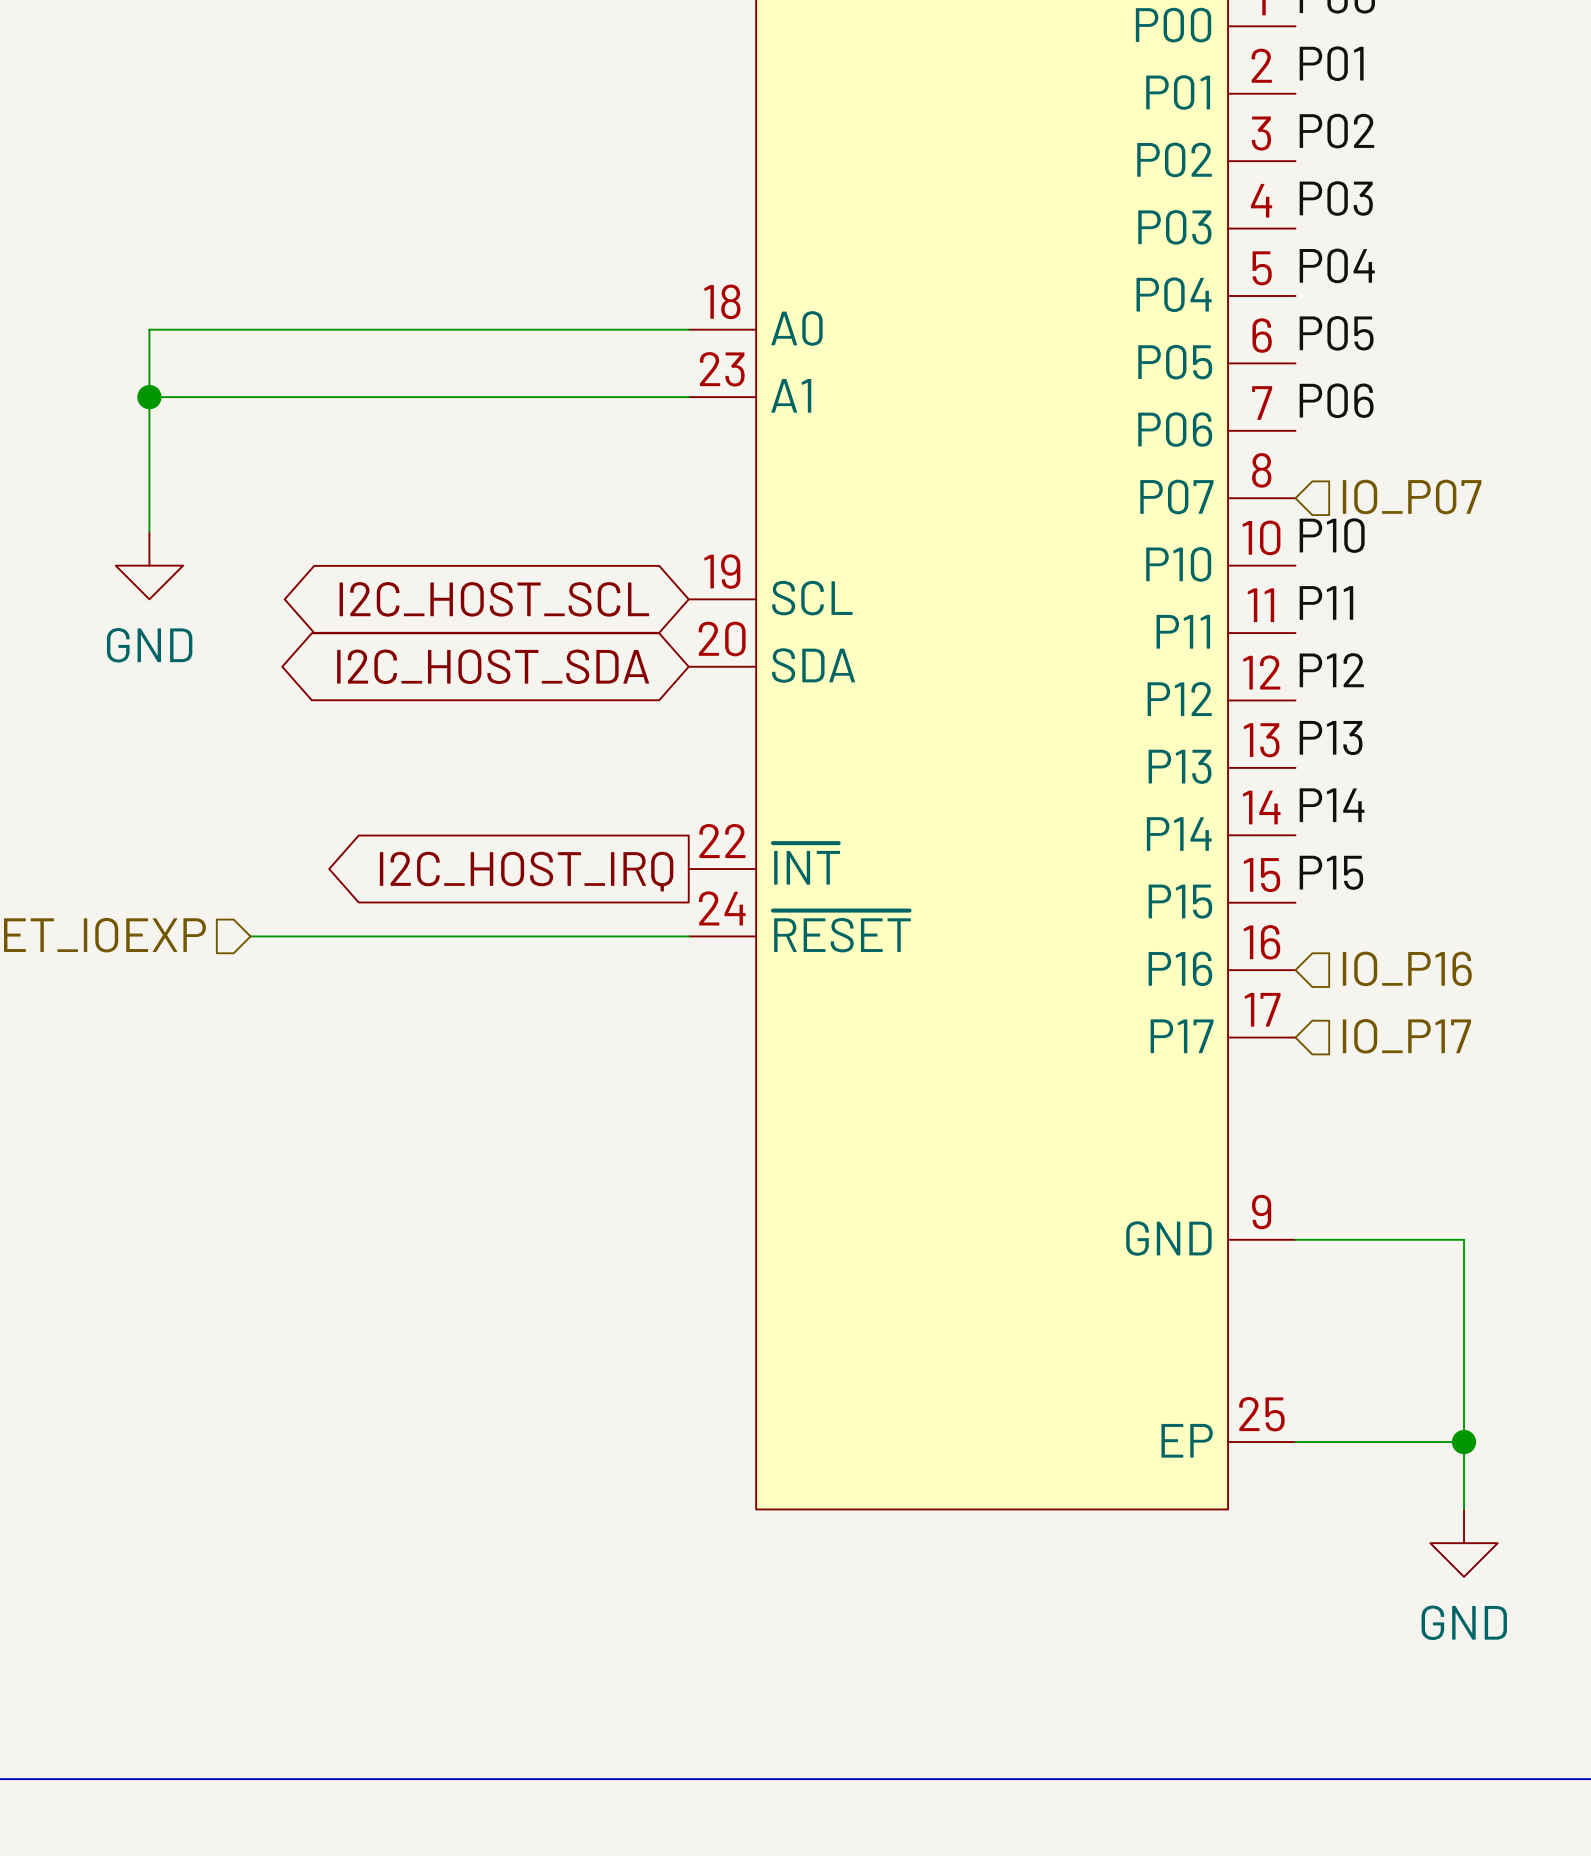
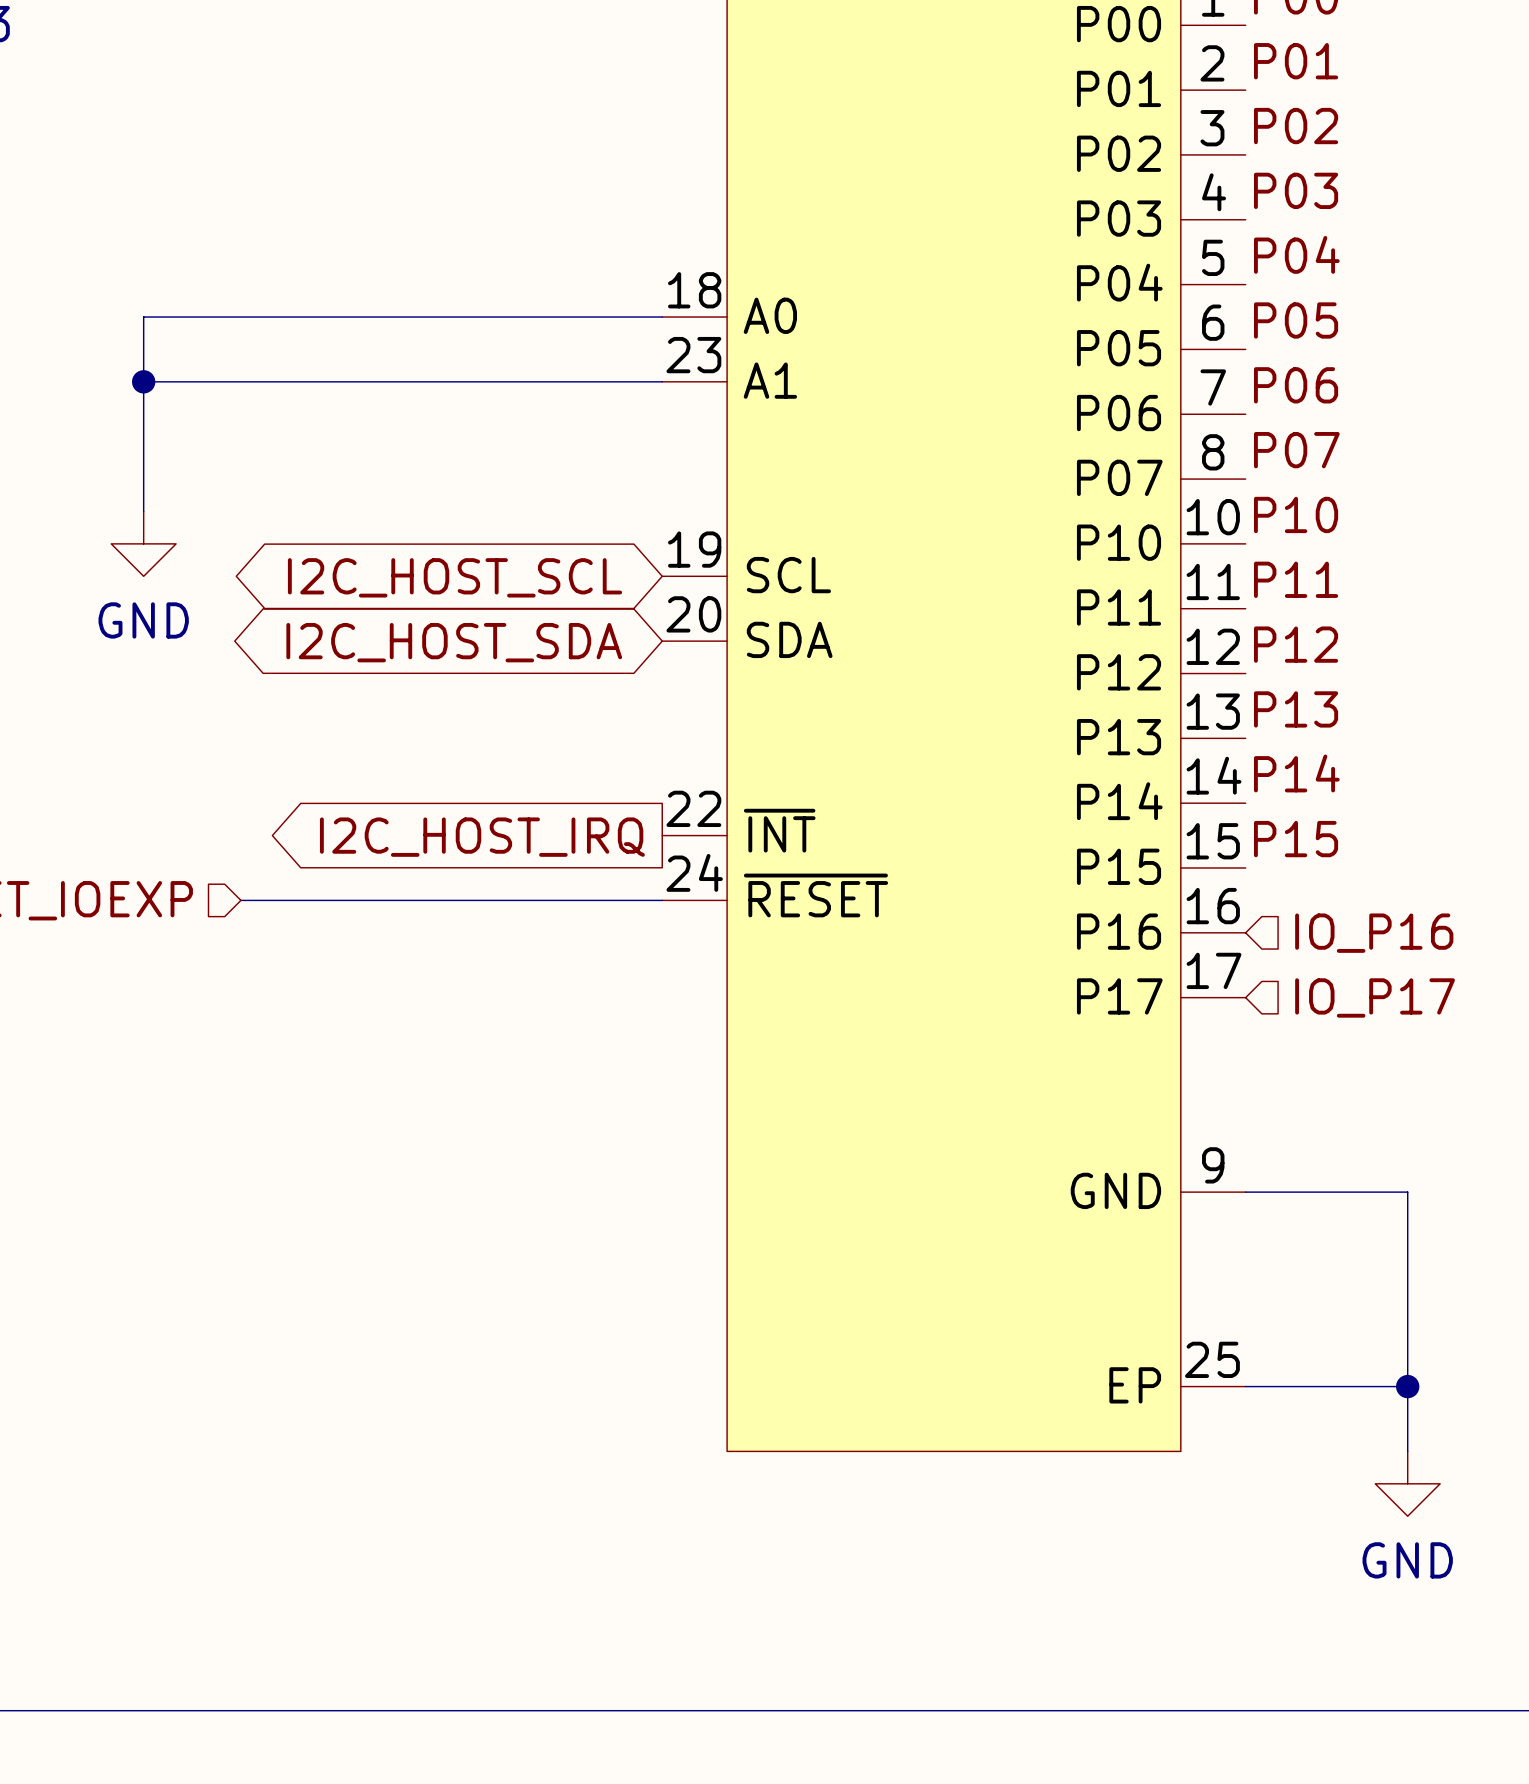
label: none -> P07 (1296, 450)
hierarchical label: IO_P07 (1412, 496) -> none

